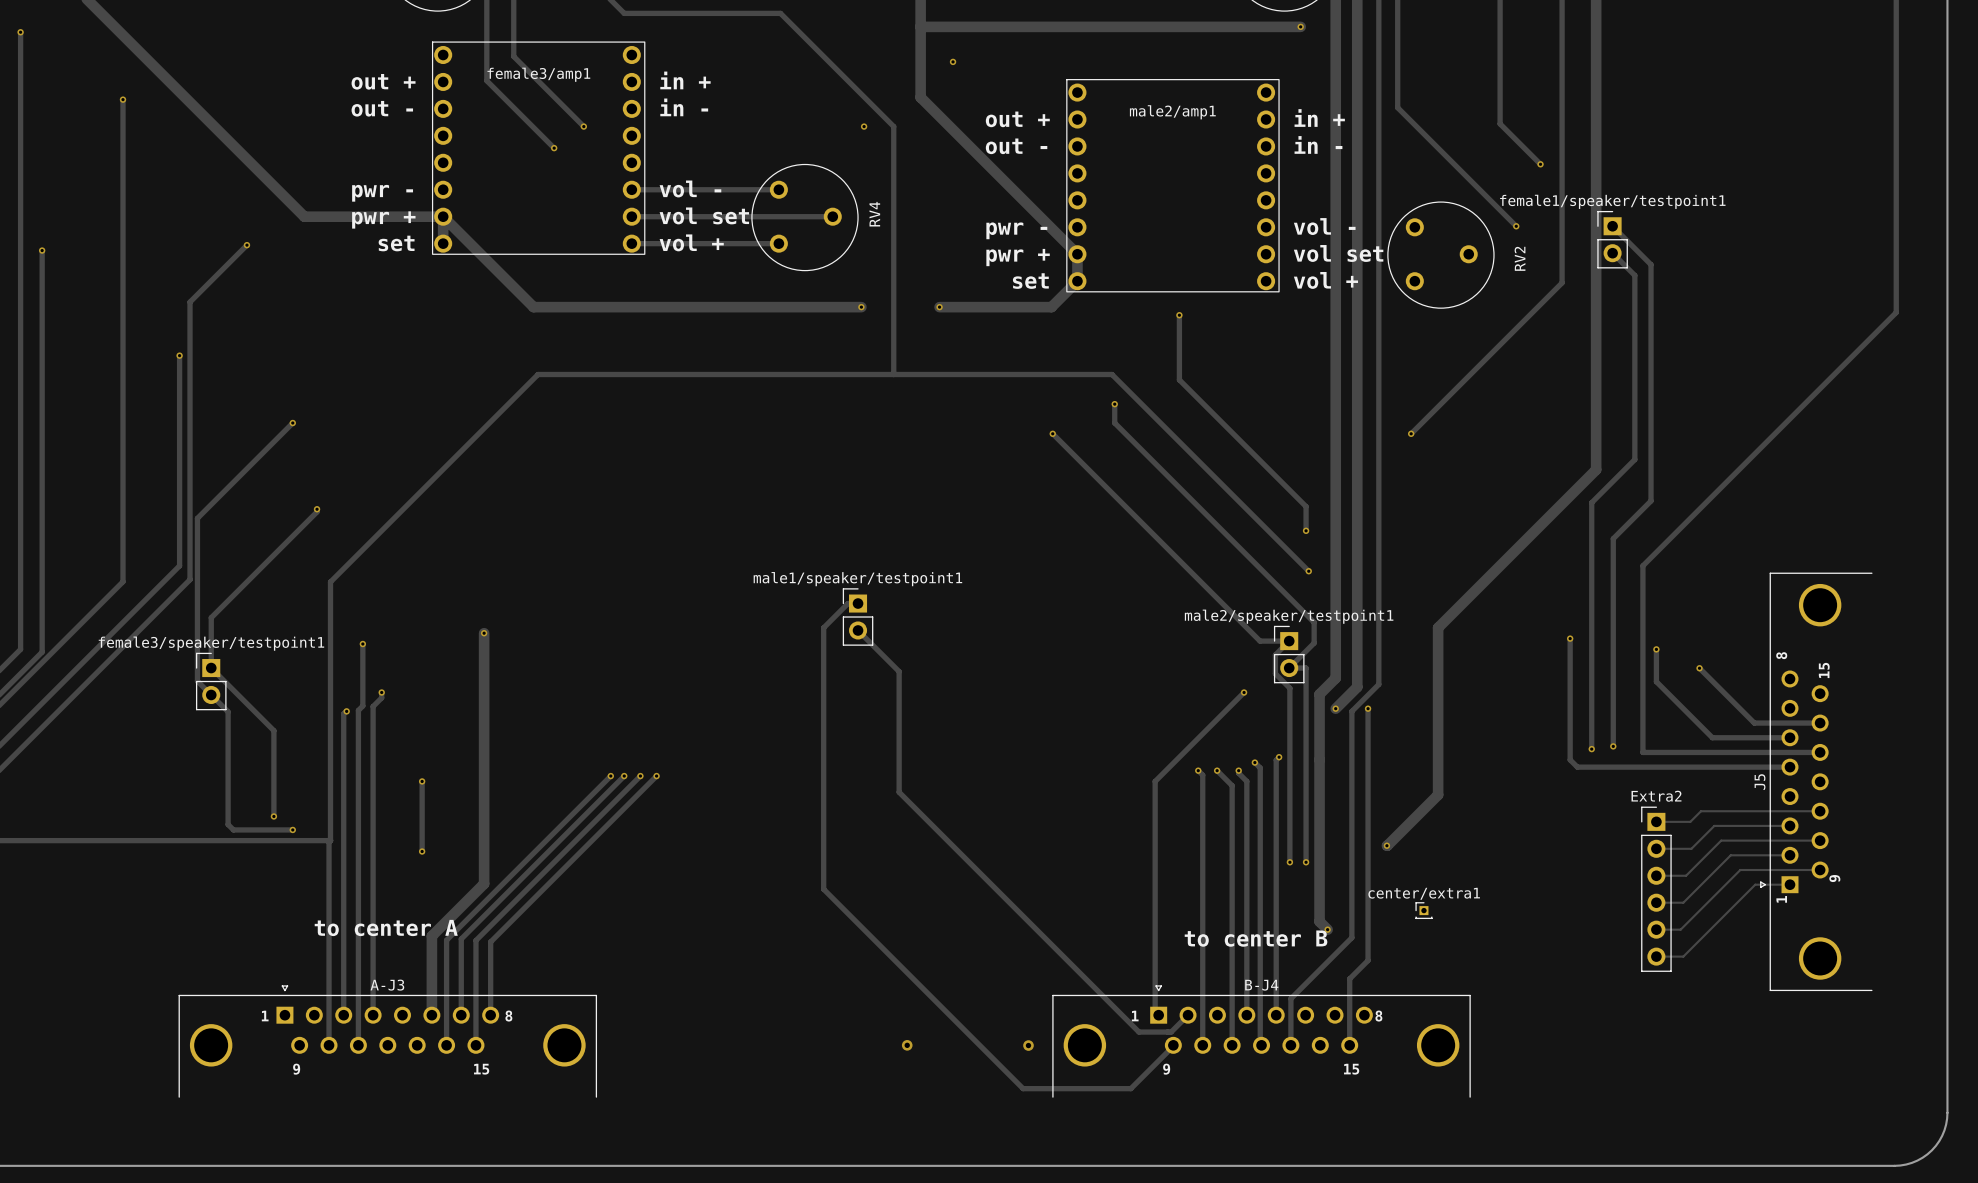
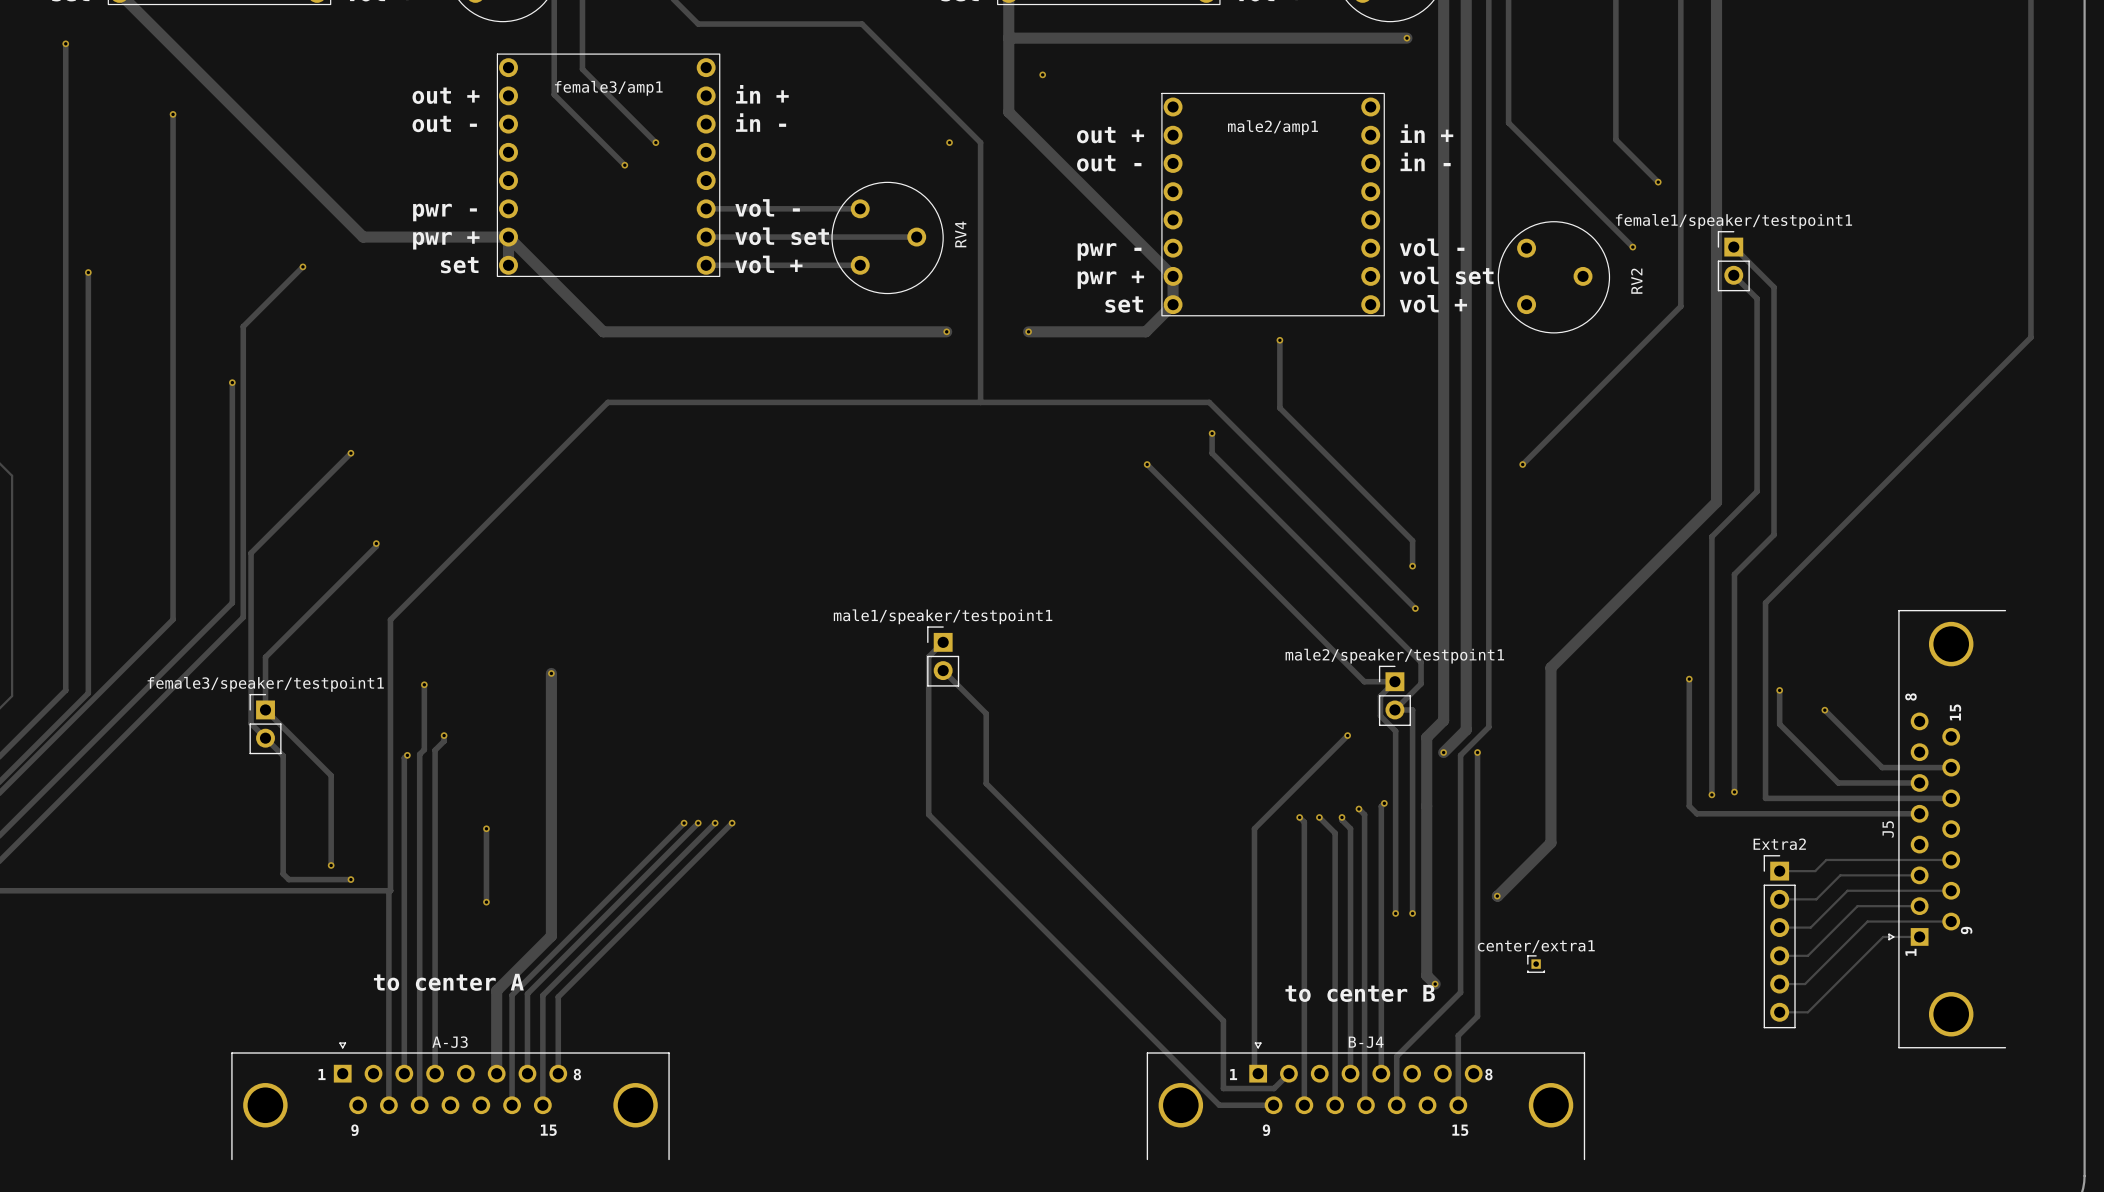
track: (858, 603) (847, 603) (823, 627) (823, 889) (1023, 1088) (1130, 1088) (1173, 1045) -> (943, 642) (928, 656) (928, 814) (1219, 1105) (1273, 1105)
track: (899, 738) (899, 792) (1138, 1032) (1171, 1032) (1173, 1029) -> (986, 783) (1223, 1020) (1223, 1088) (1274, 1088)
via: (907, 1045) -> none
via: (1028, 1045) -> none

